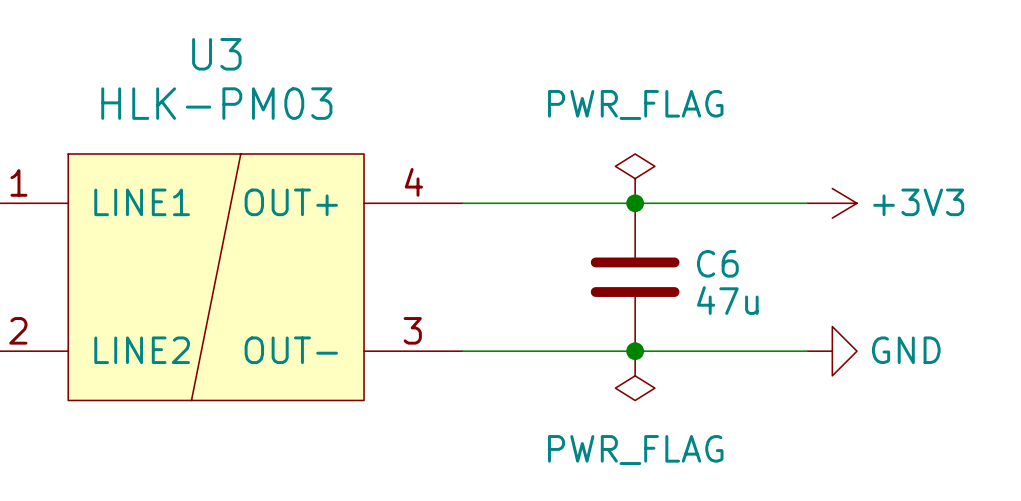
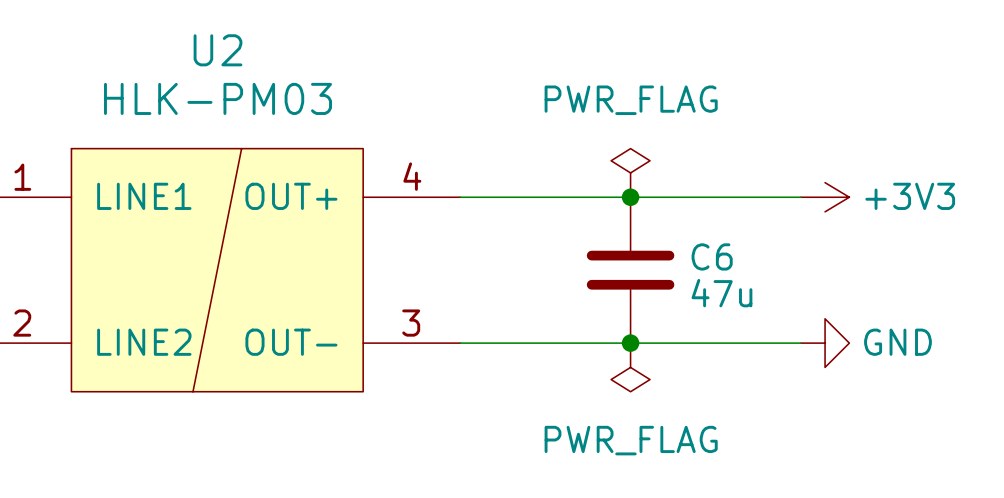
U3 name: U3 (216, 54) -> U2 (218, 50)

